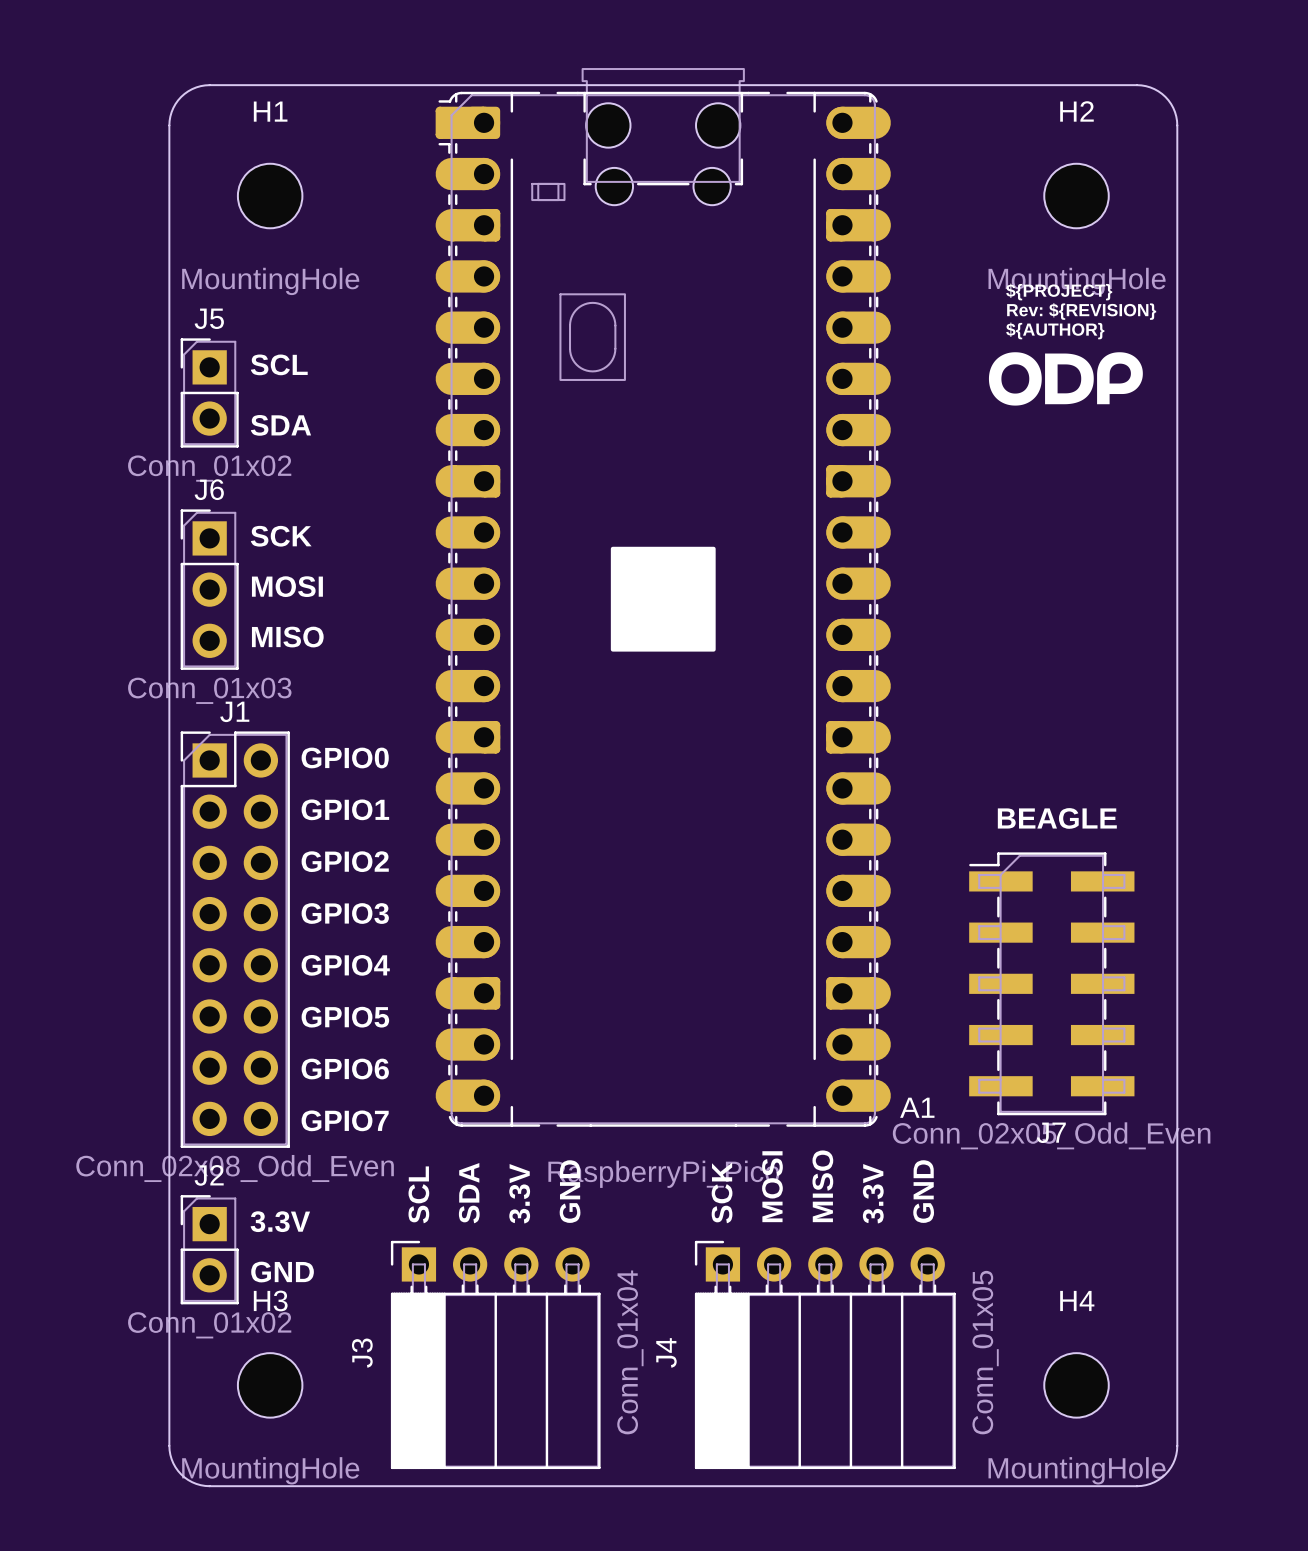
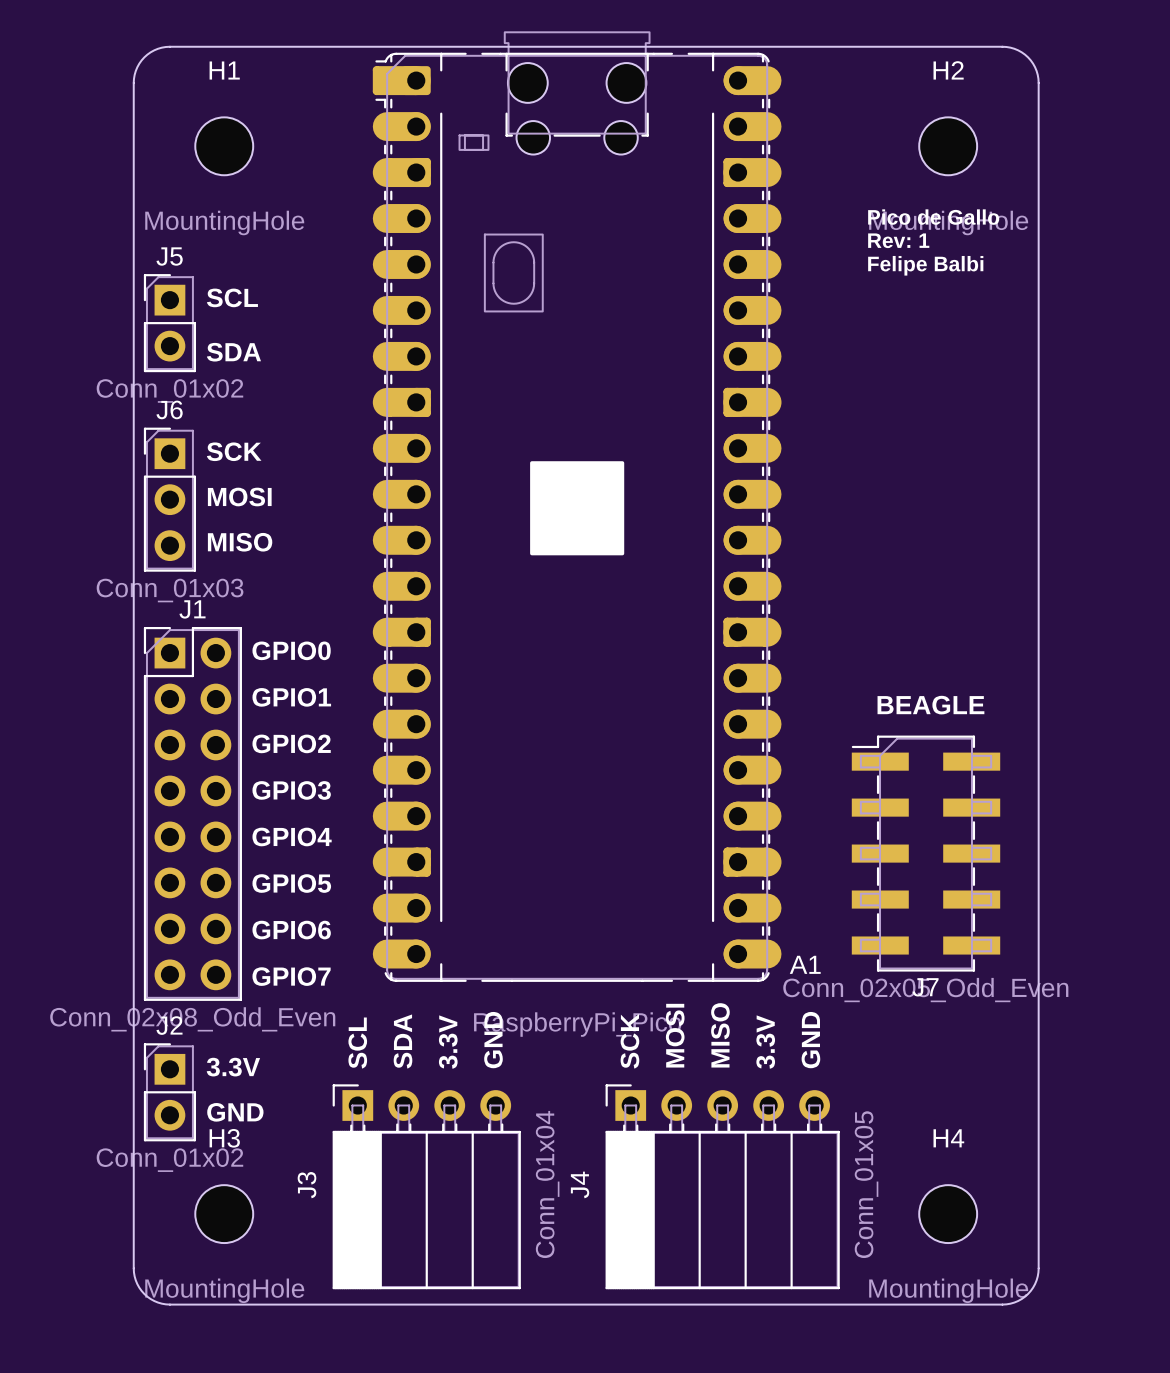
text: none -> Pico de Gallo (933, 217)
text: ${PROJECT} (1059, 292) -> none
text: none -> Rev: 1 (898, 240)
text: Rev: ${REVISION} (1081, 311) -> none
text: none -> Felipe Balbi (925, 265)
text: ${AUTHOR} (1055, 330) -> none
drawing: [988, 352, 1143, 406] -> none

